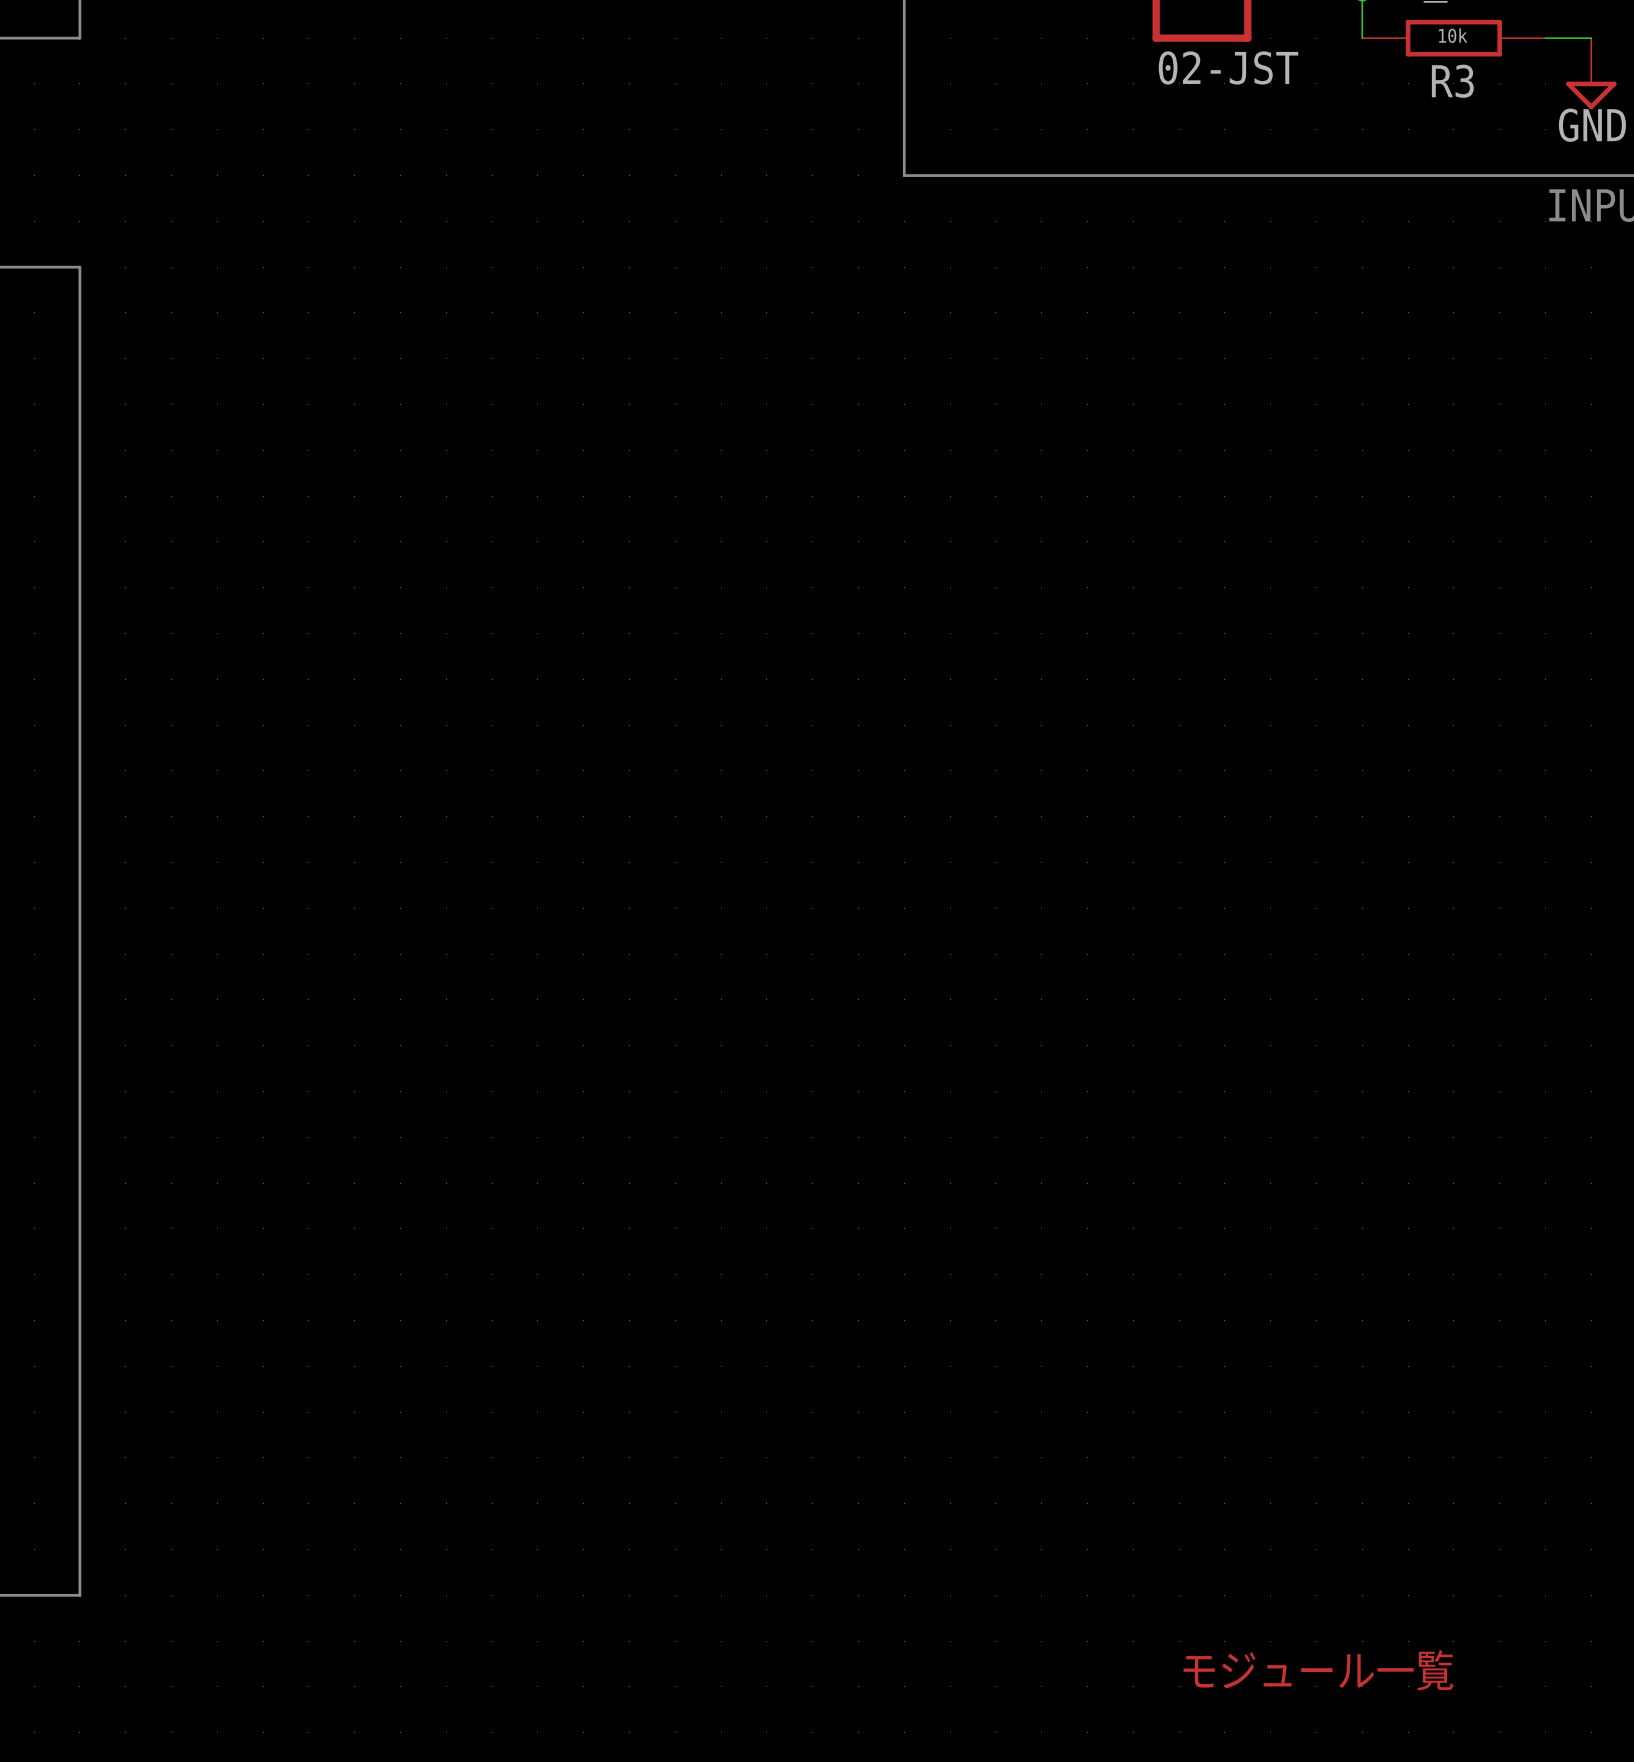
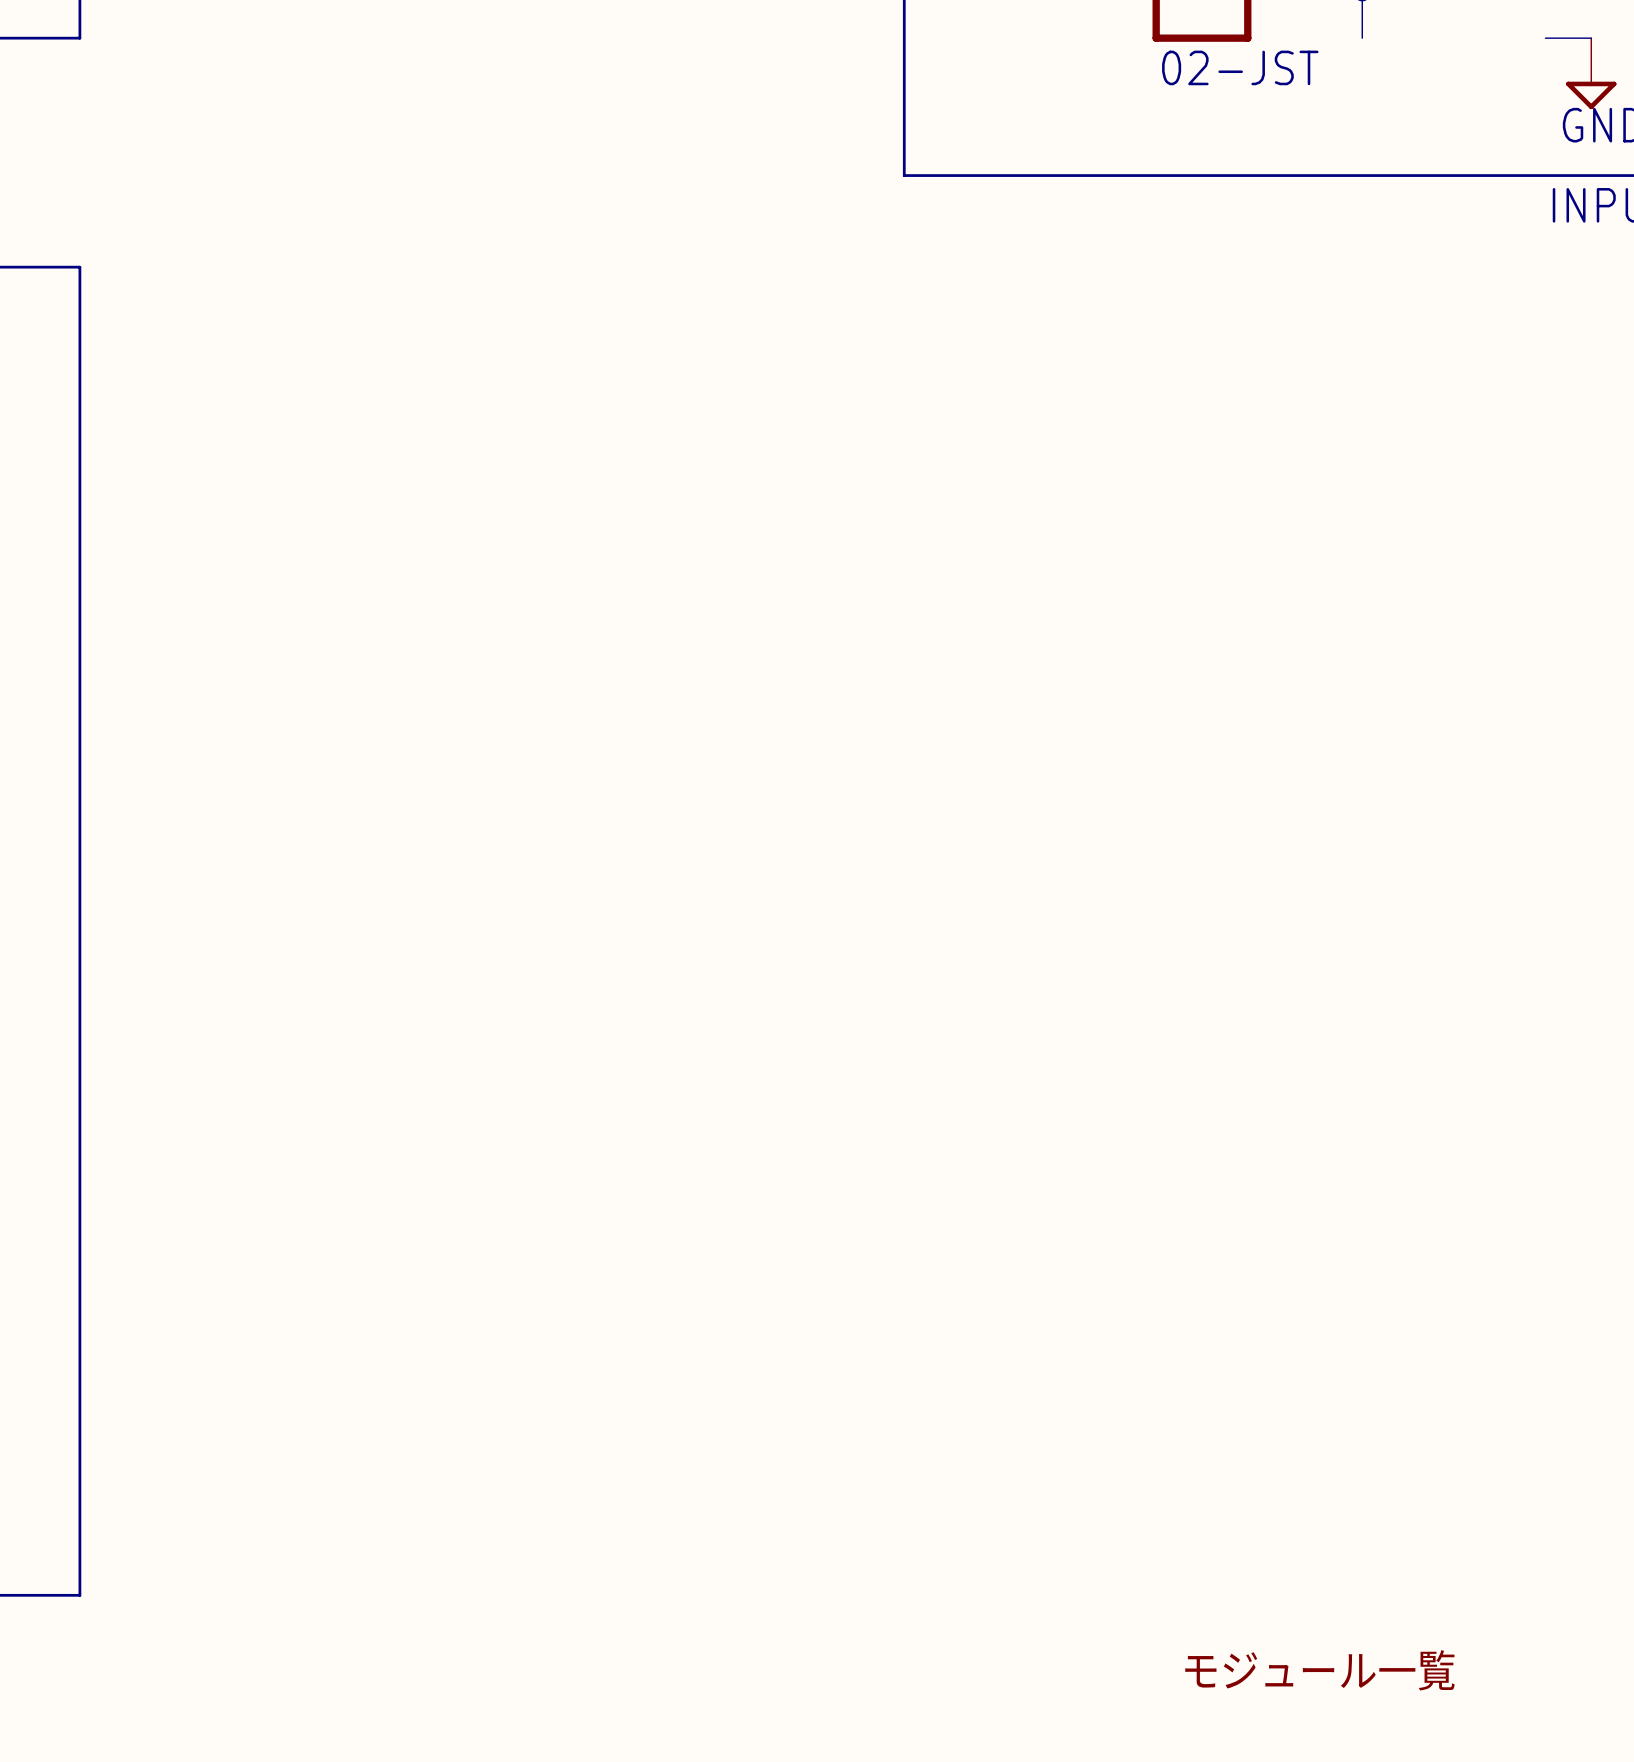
R3: 10k (1453, 38) -> none

